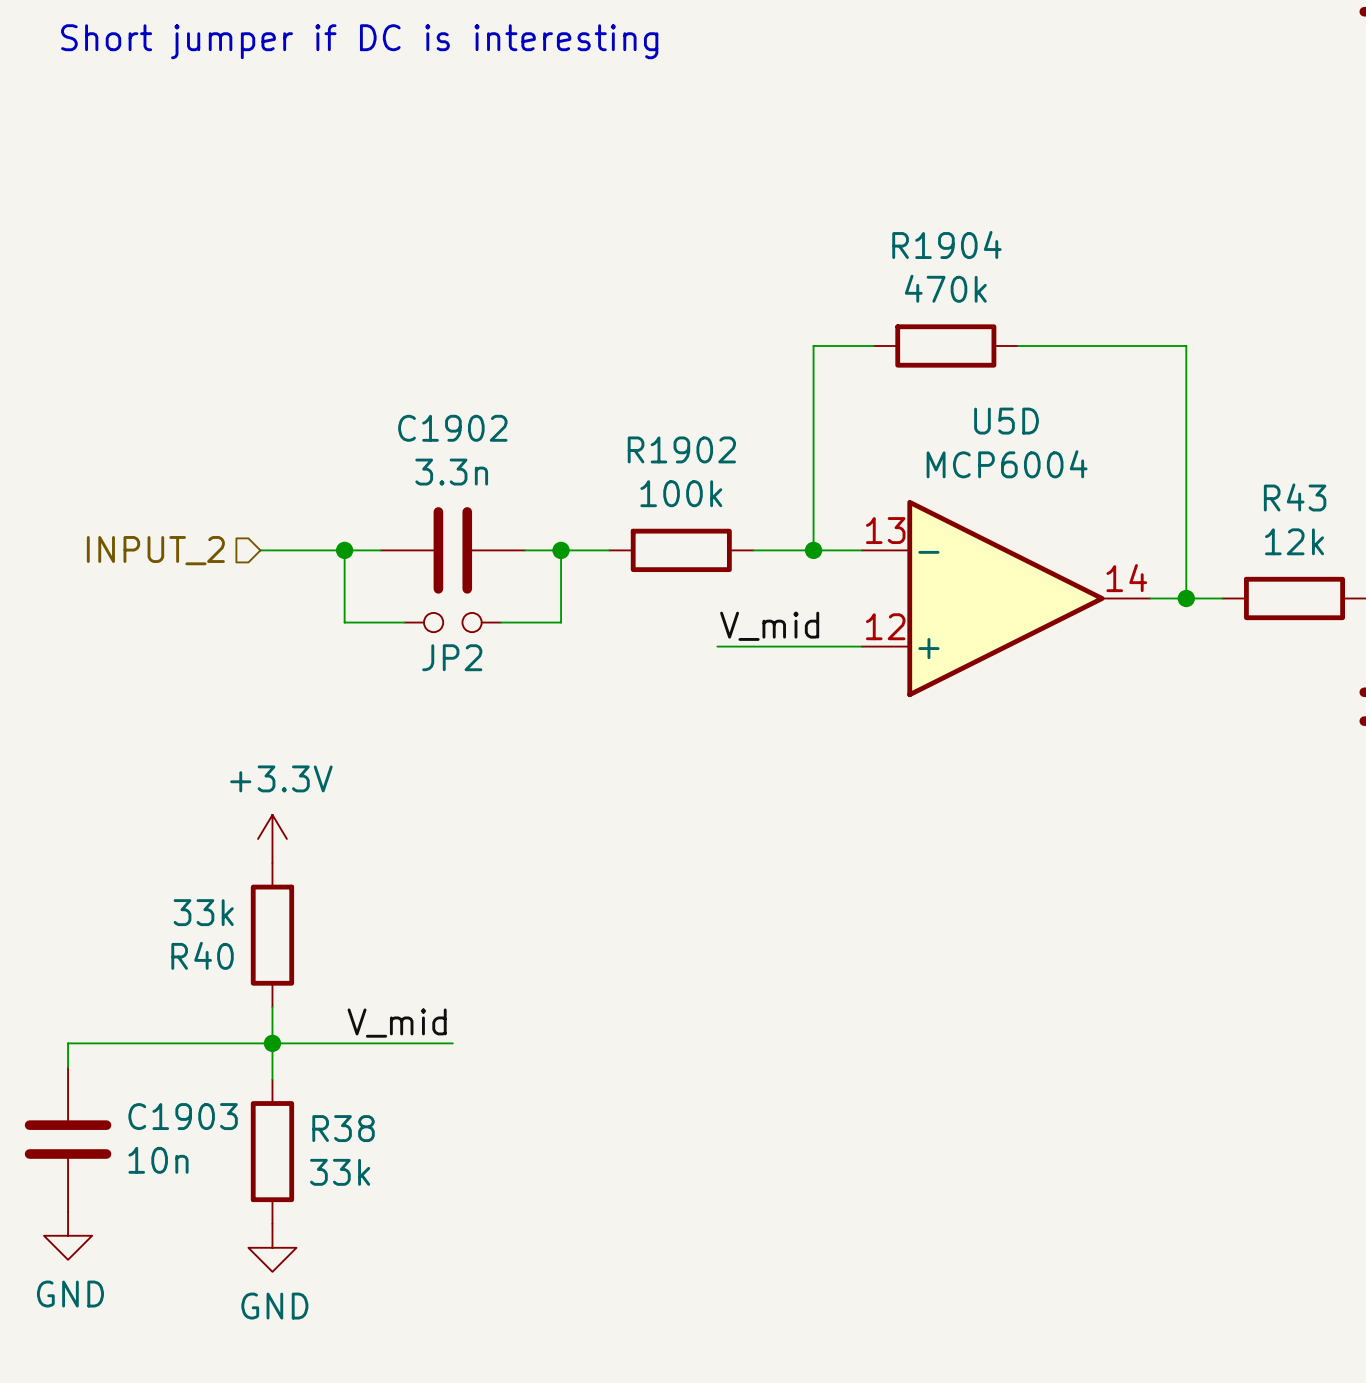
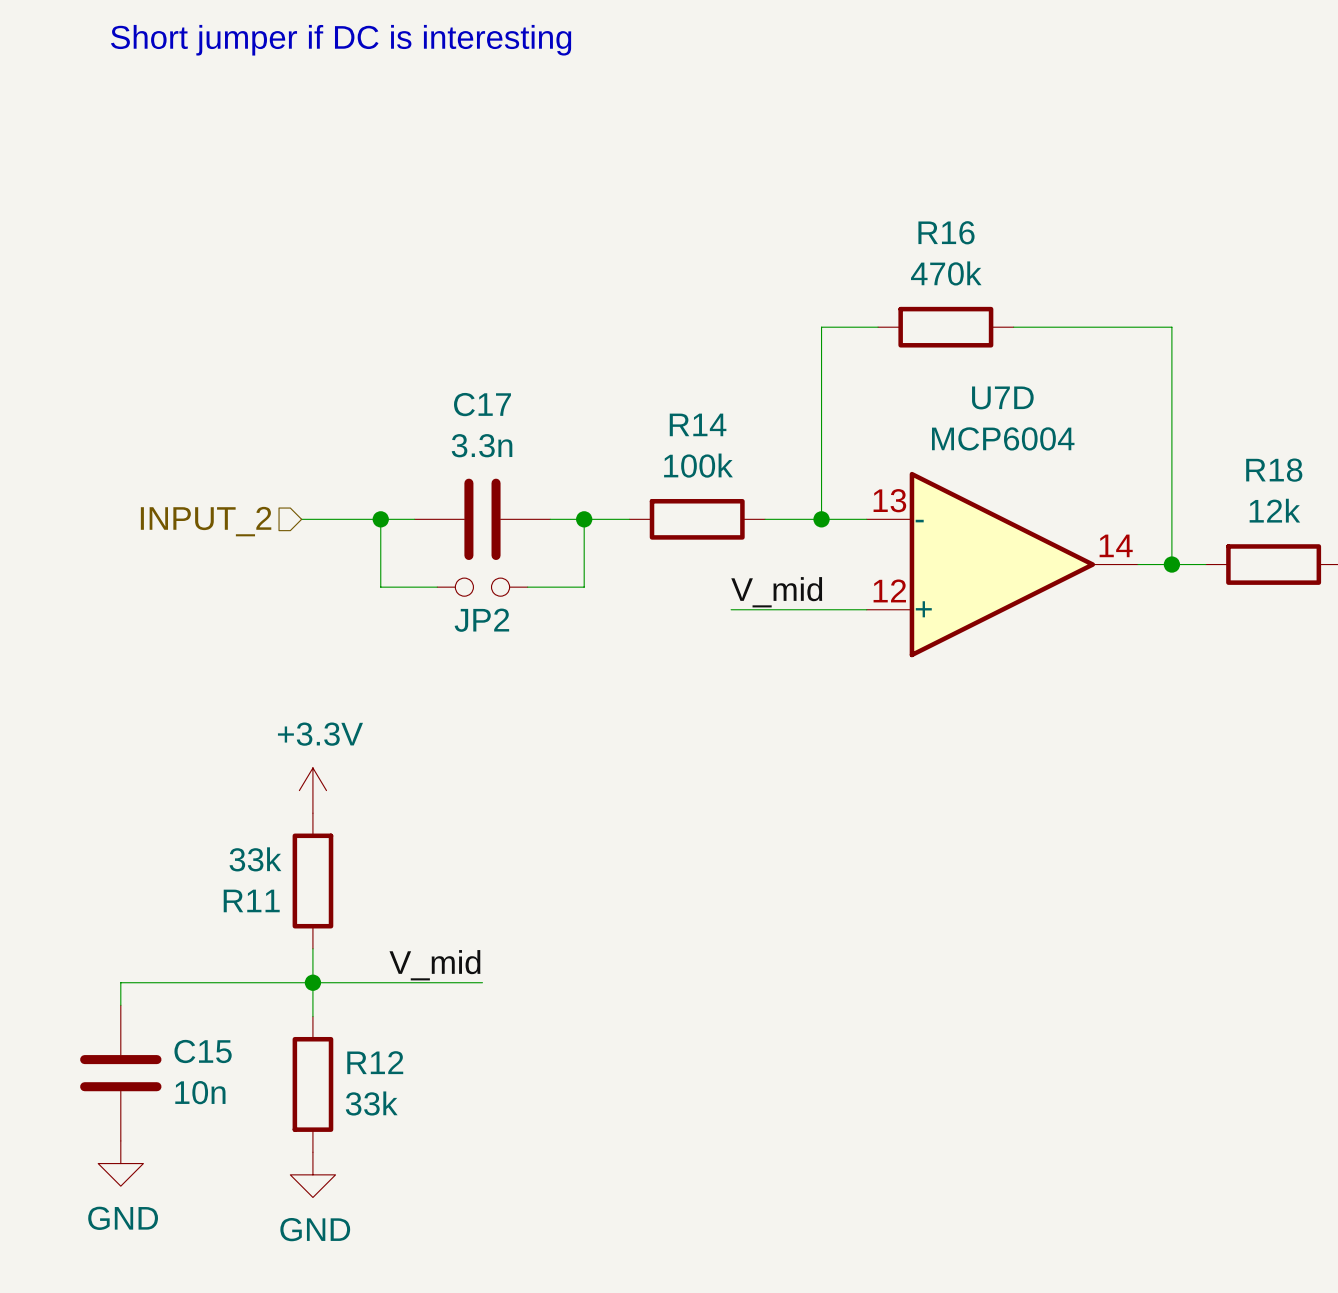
R1904 name: R1904 (946, 244) -> R16 (946, 232)
U5D name: U5D (1006, 421) -> U7D (1002, 397)
C1902 name: C1902 (452, 428) -> C17 (482, 404)
R1902 name: R1902 (681, 449) -> R14 (698, 424)
R43 name: R43 (1295, 497) -> R18 (1274, 470)
R40 name: R40 (202, 955) -> R11 (251, 900)
C1903 name: C1903 (183, 1116) -> C15 (203, 1051)
R38 name: R38 (343, 1128) -> R12 (375, 1062)

